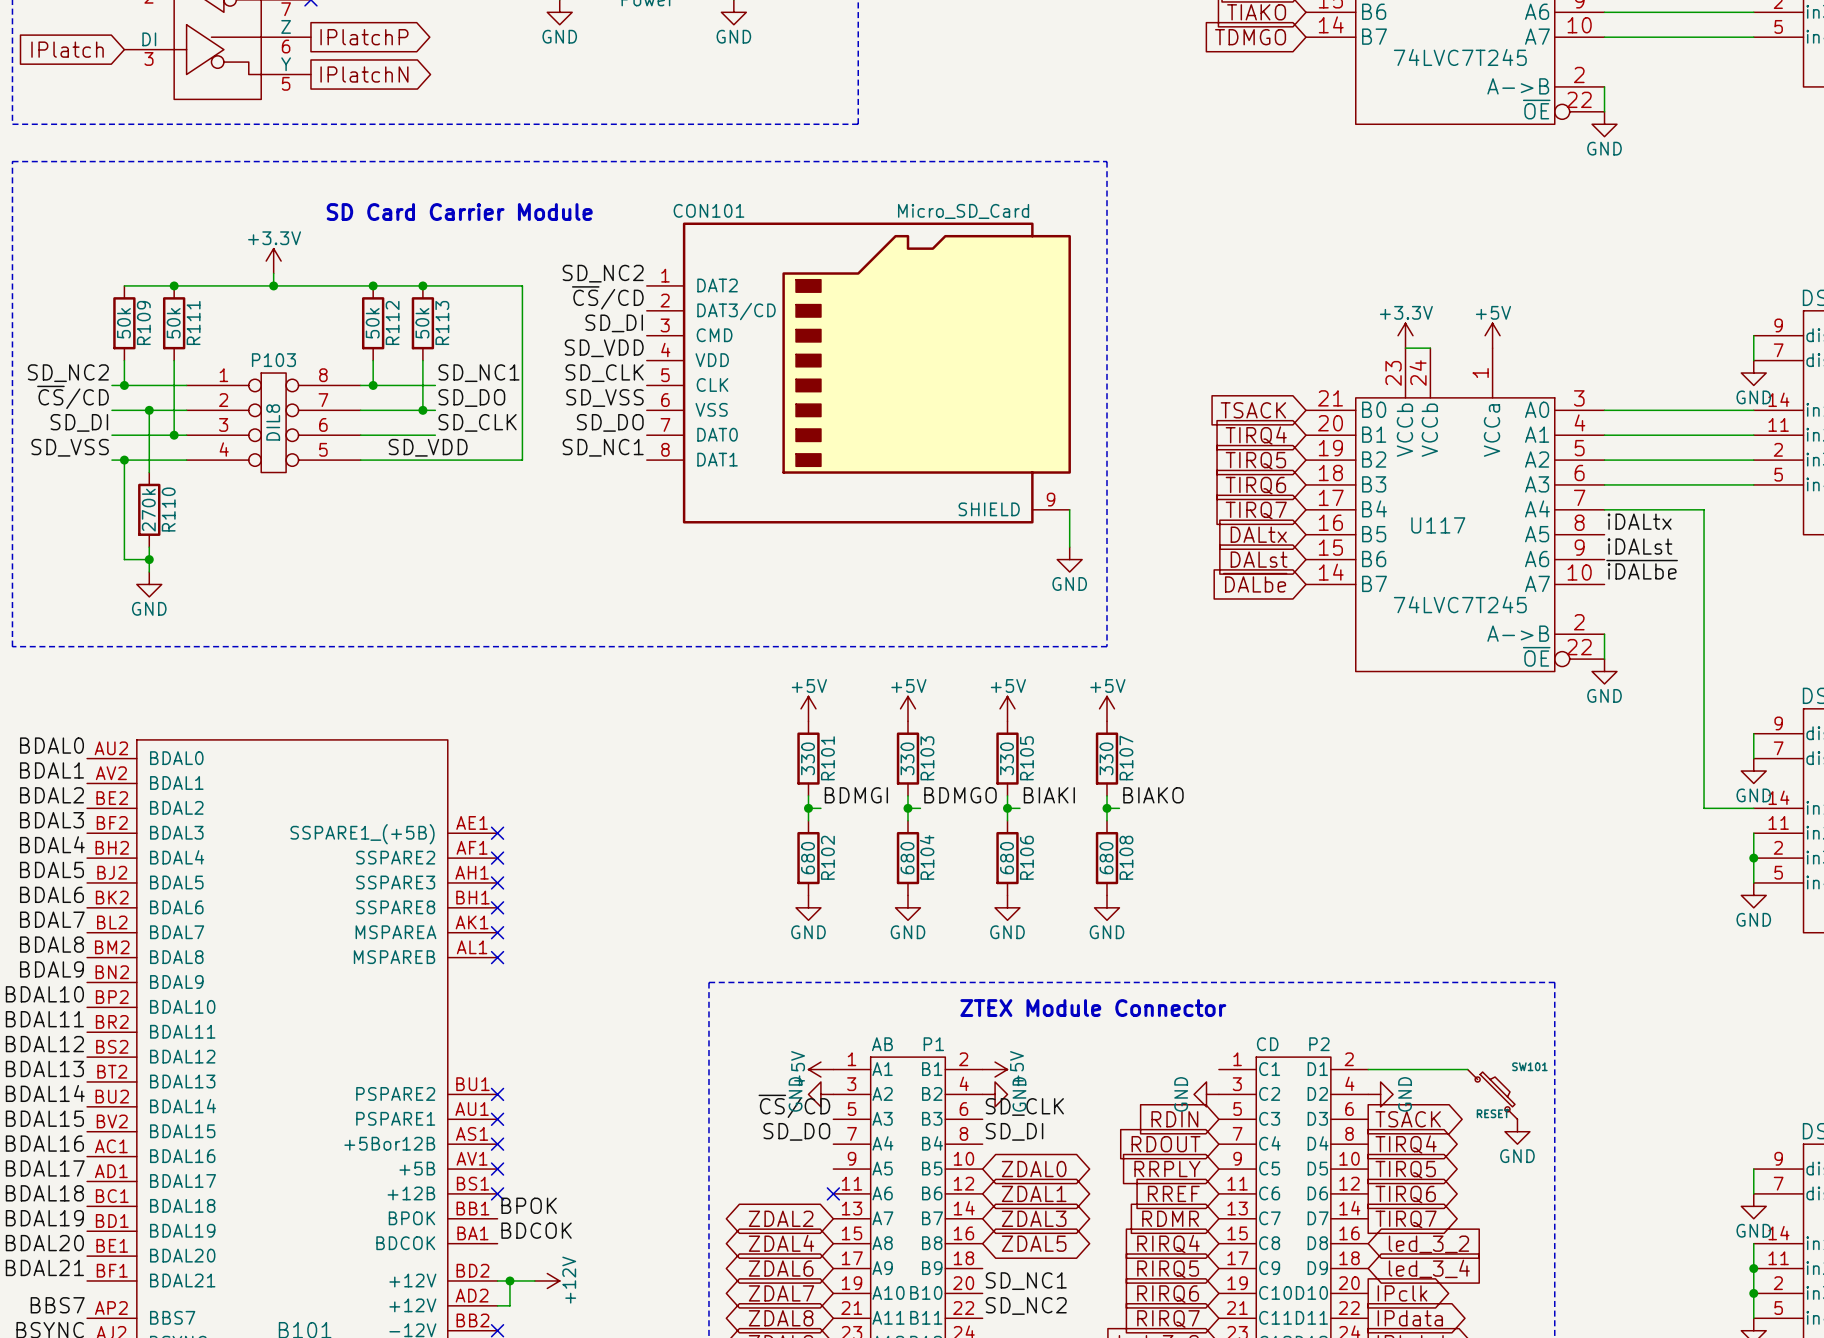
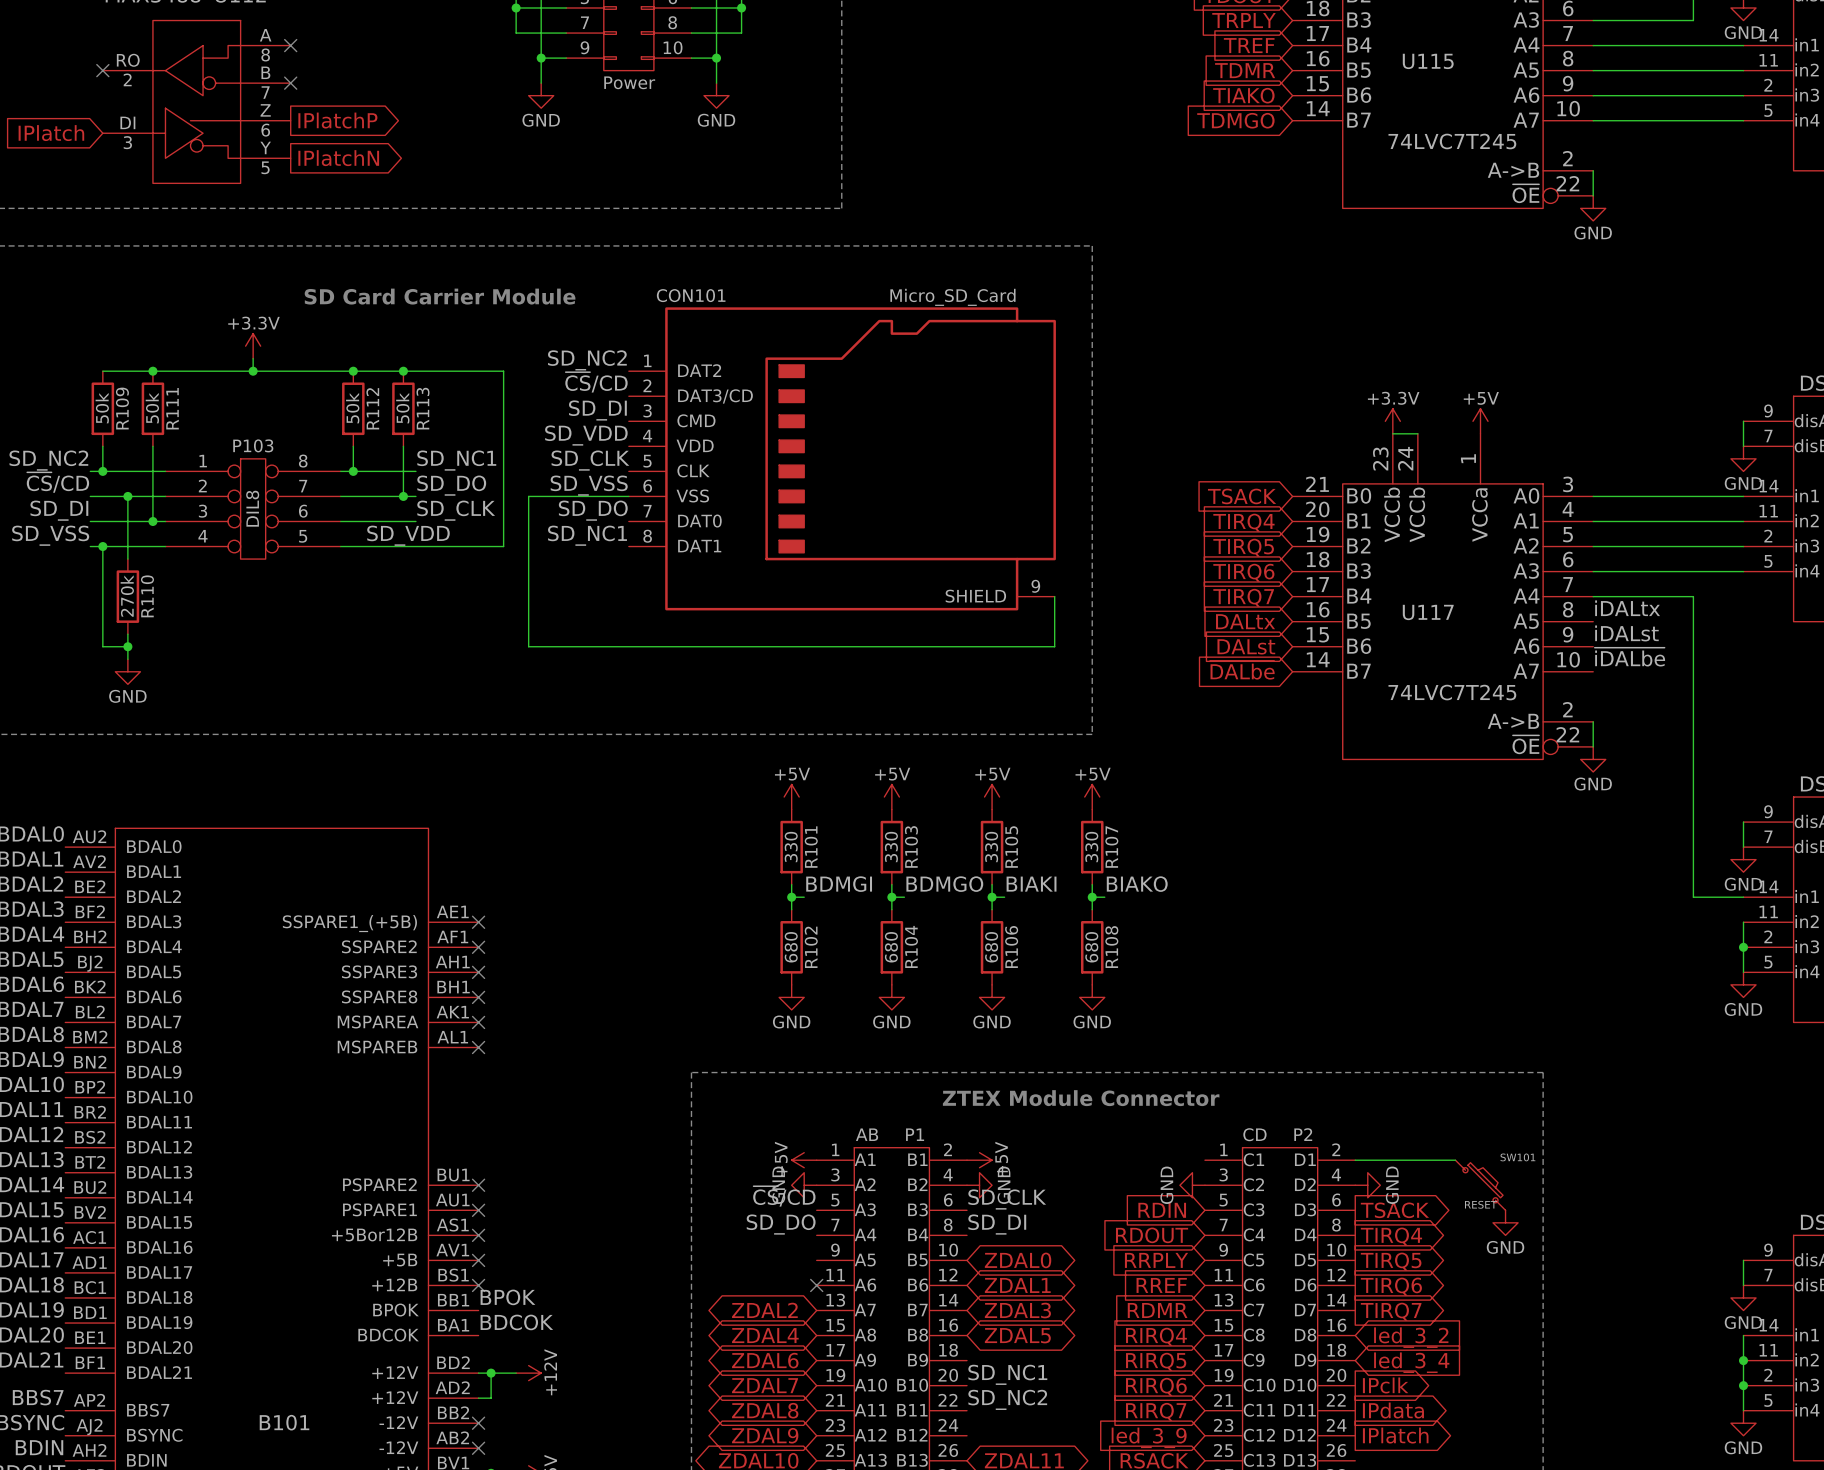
wire: none -> (628, 496) (528, 496) (528, 646) (1054, 646) (1054, 634)
power symbol: GND (1069, 559) -> none

